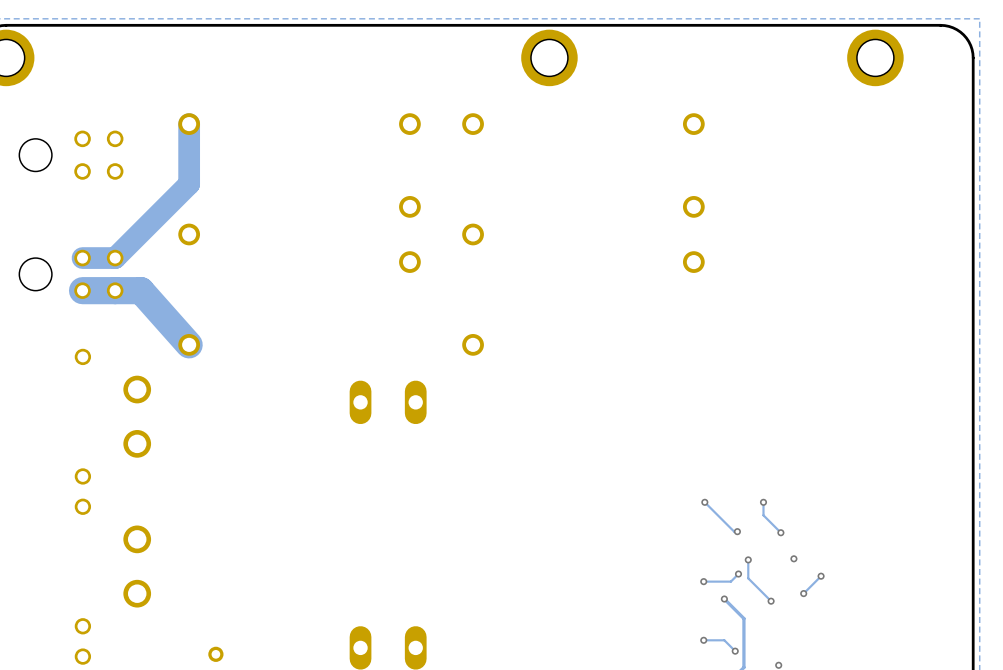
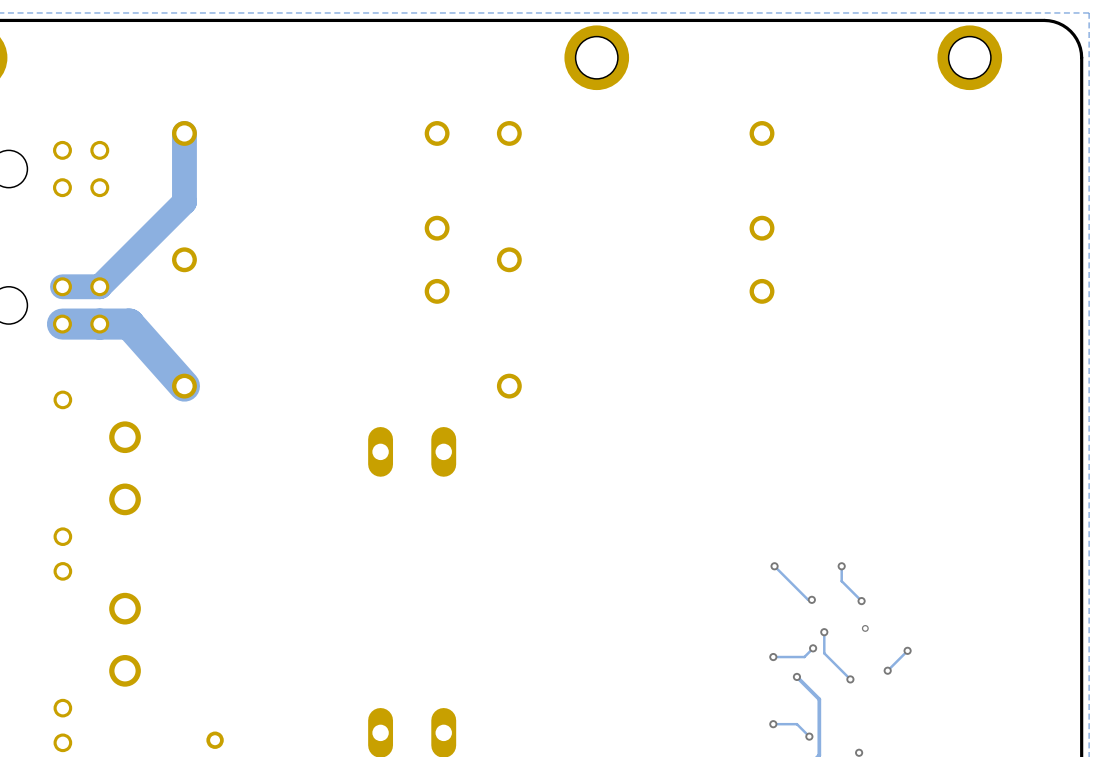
via: none -> (865, 628)
via: (793, 558) -> none

